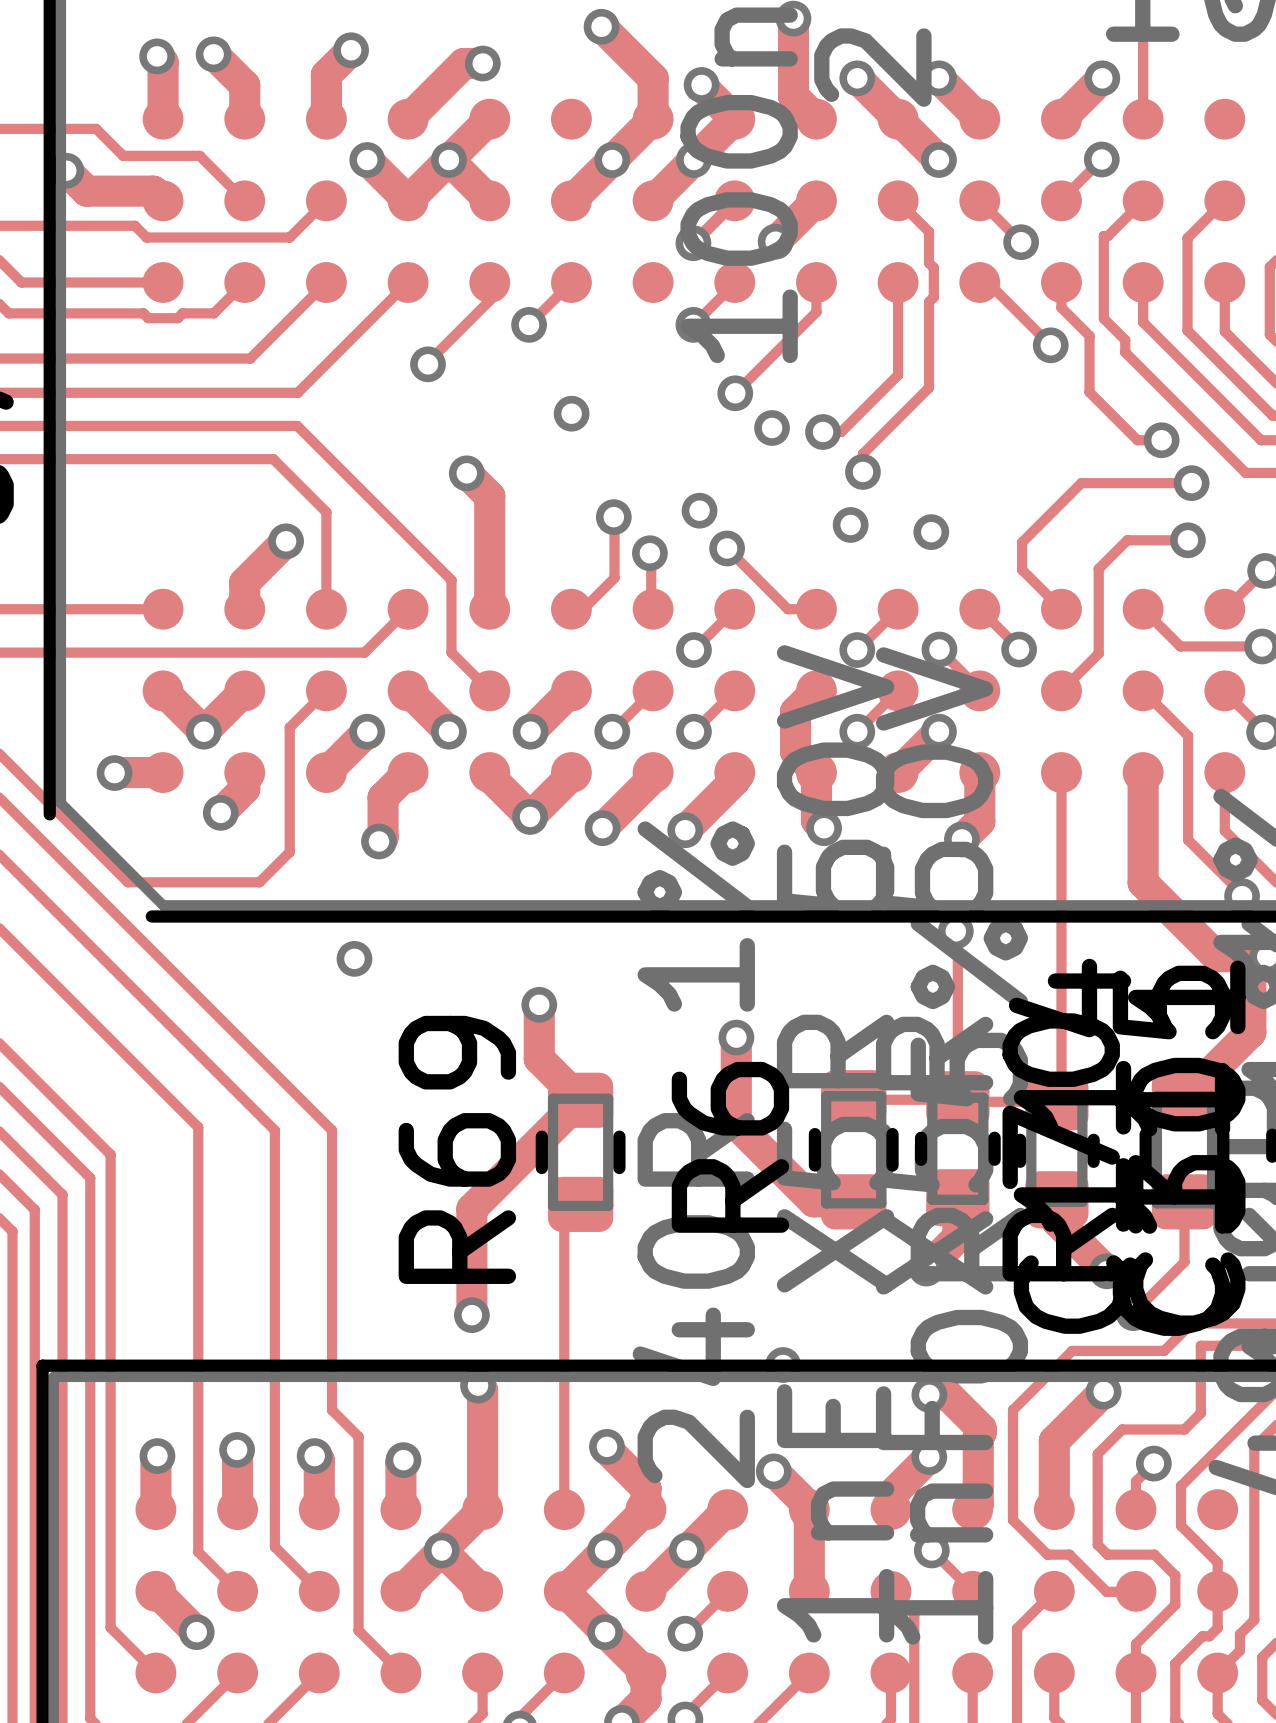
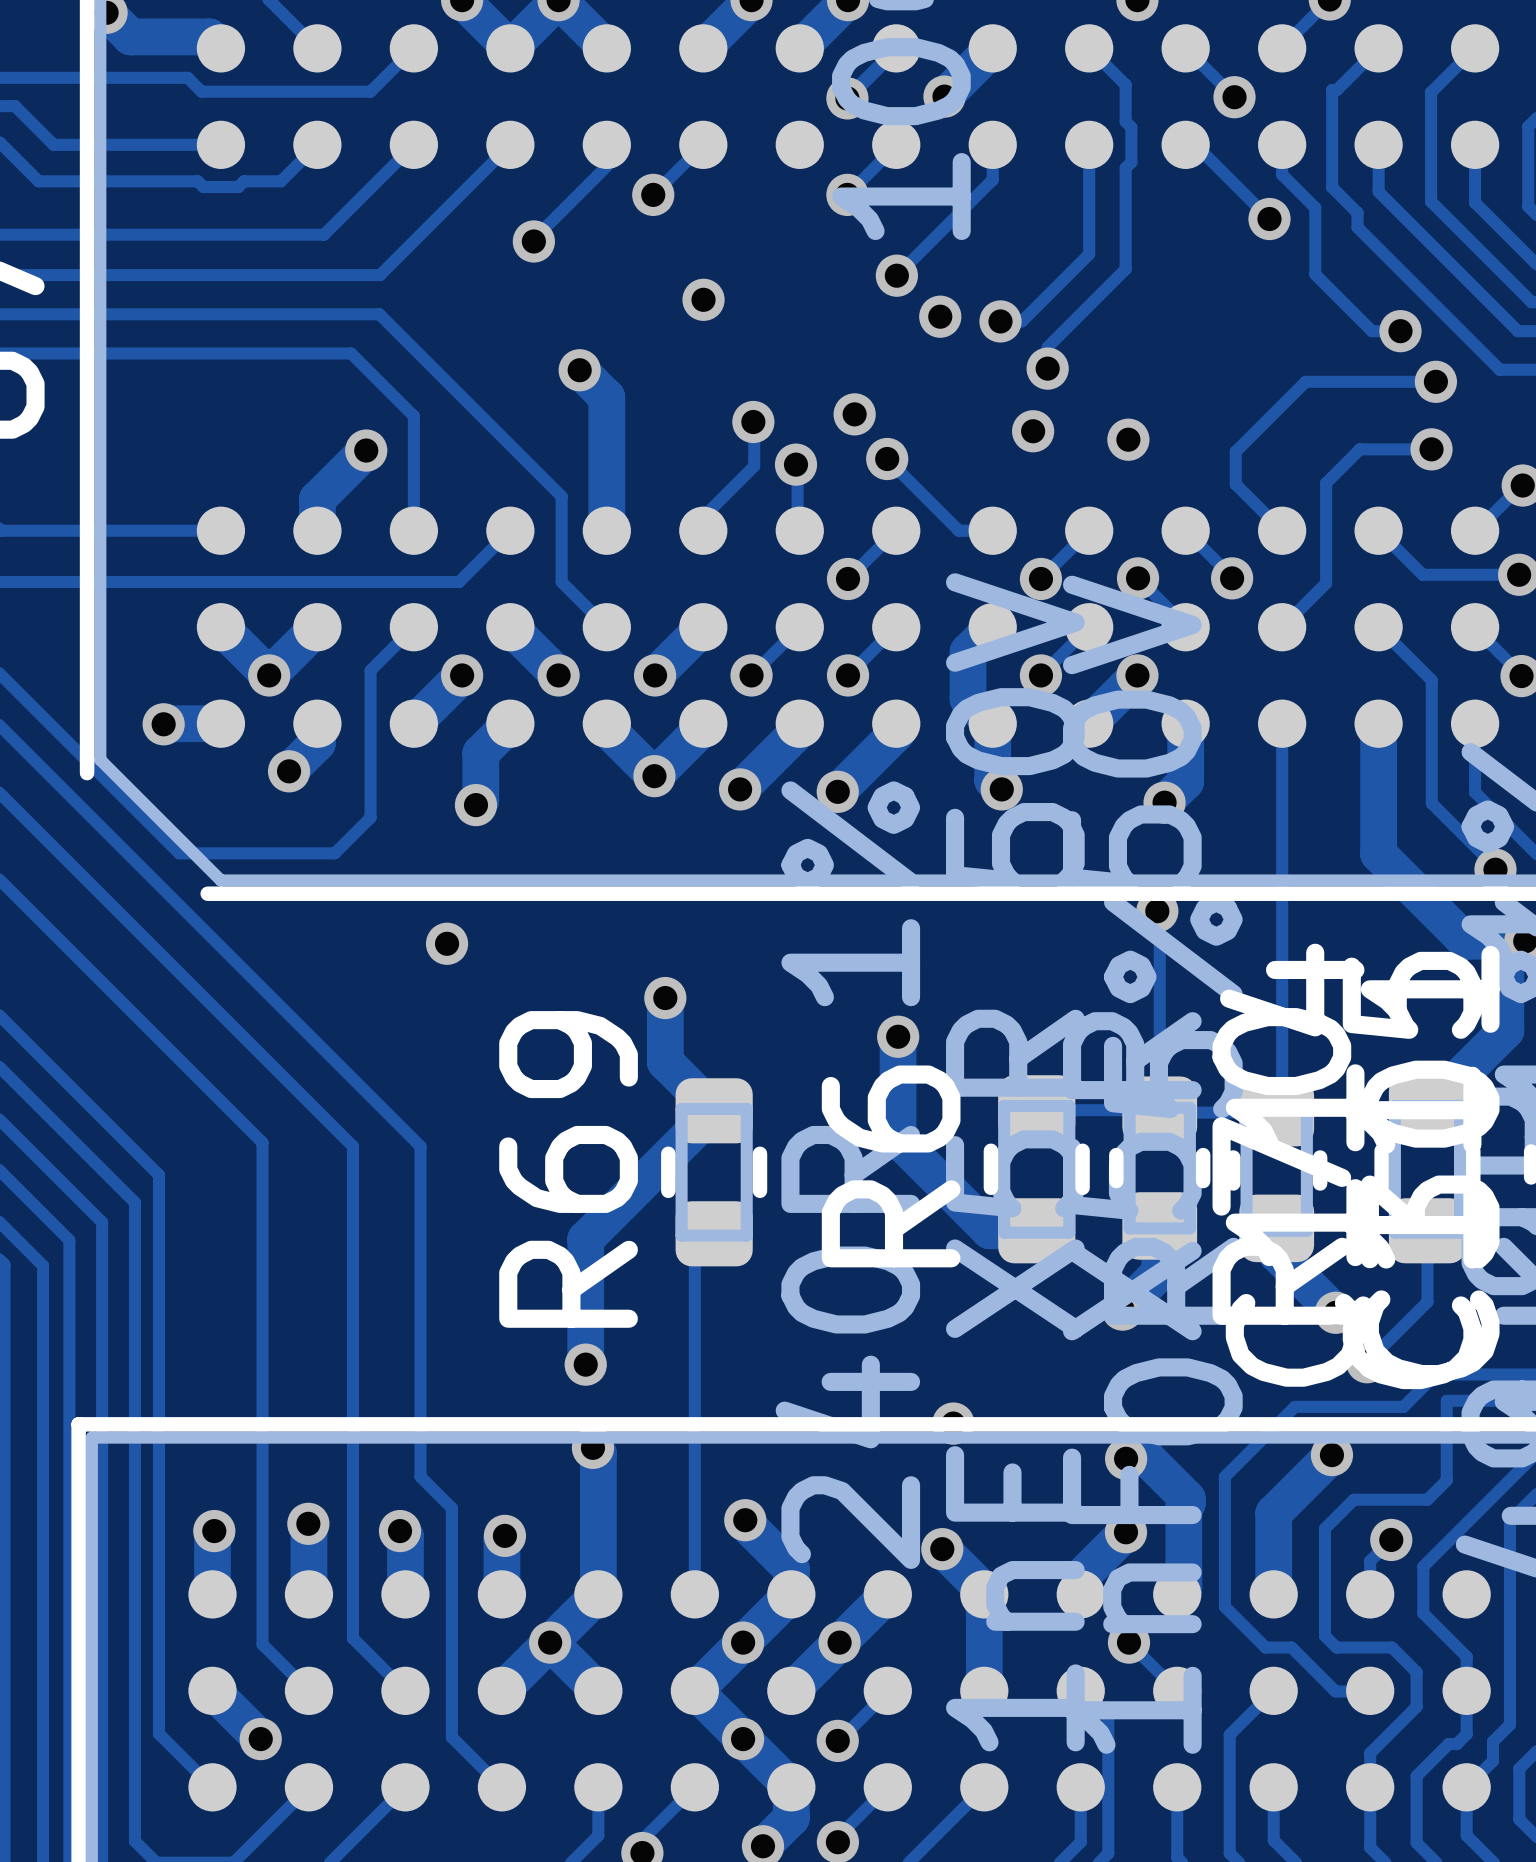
track: (614, 554) (614, 578) (583, 609) (571, 609) -> (754, 466) (703, 517) (703, 530)

